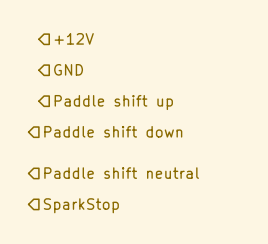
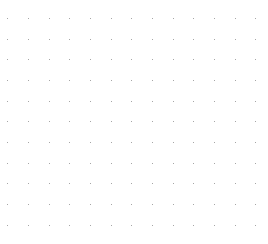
hierarchical label: +12V (74, 38) -> none
hierarchical label: GND (68, 69) -> none
hierarchical label: Paddle shift up (113, 102) -> none
hierarchical label: Paddle shift down (113, 131) -> none
hierarchical label: Paddle shift neutral (121, 173) -> none
hierarchical label: SparkStop (81, 205) -> none

